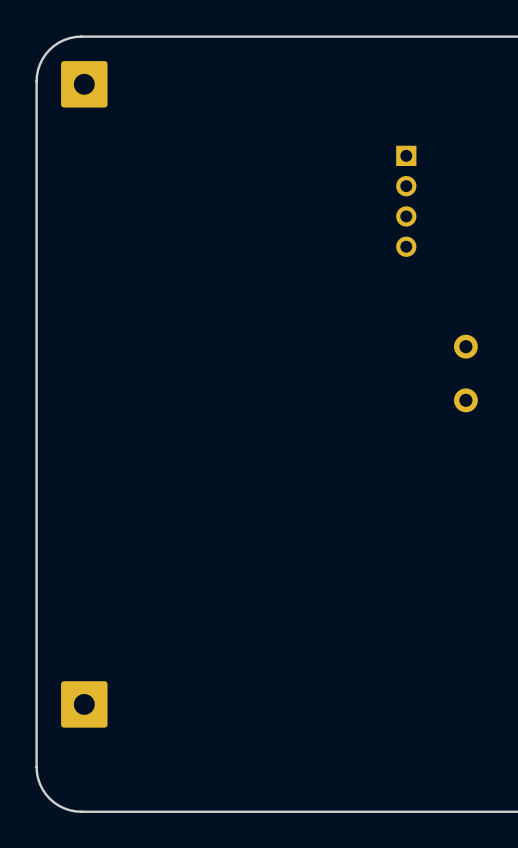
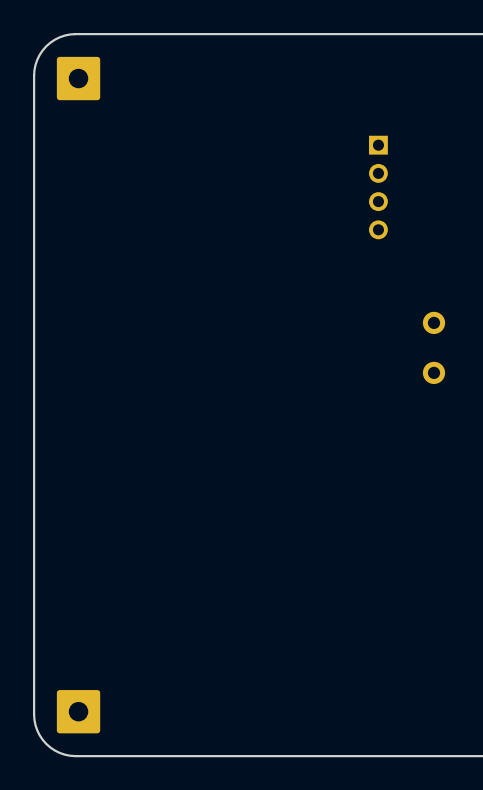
part position: (84, 704) -> (78, 711)

